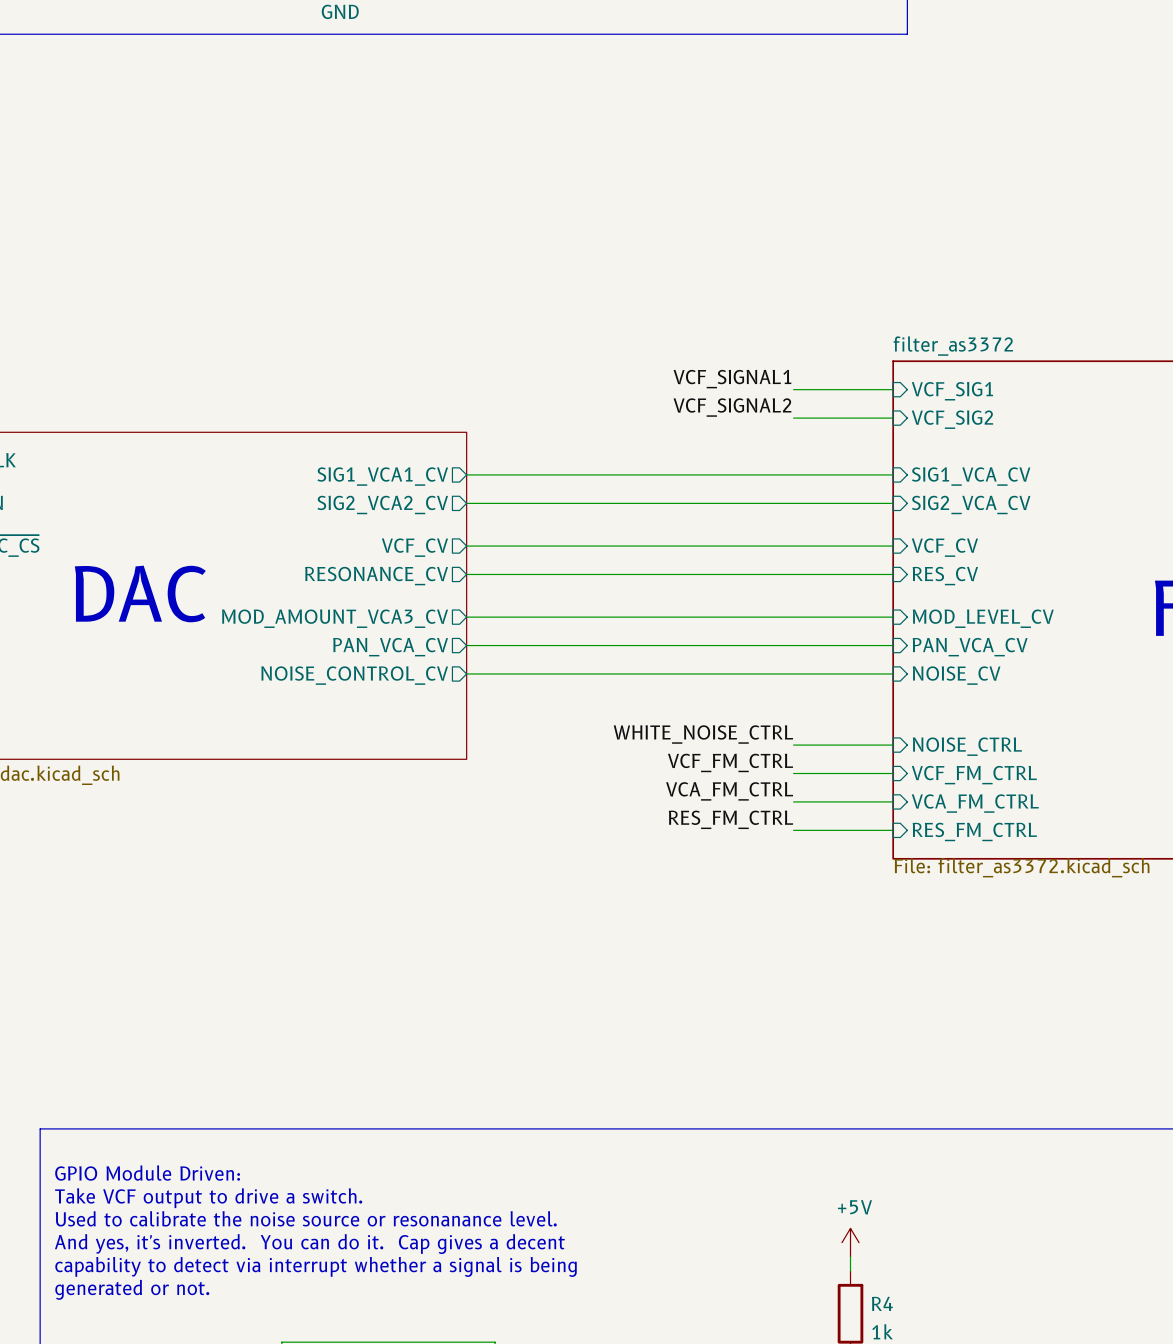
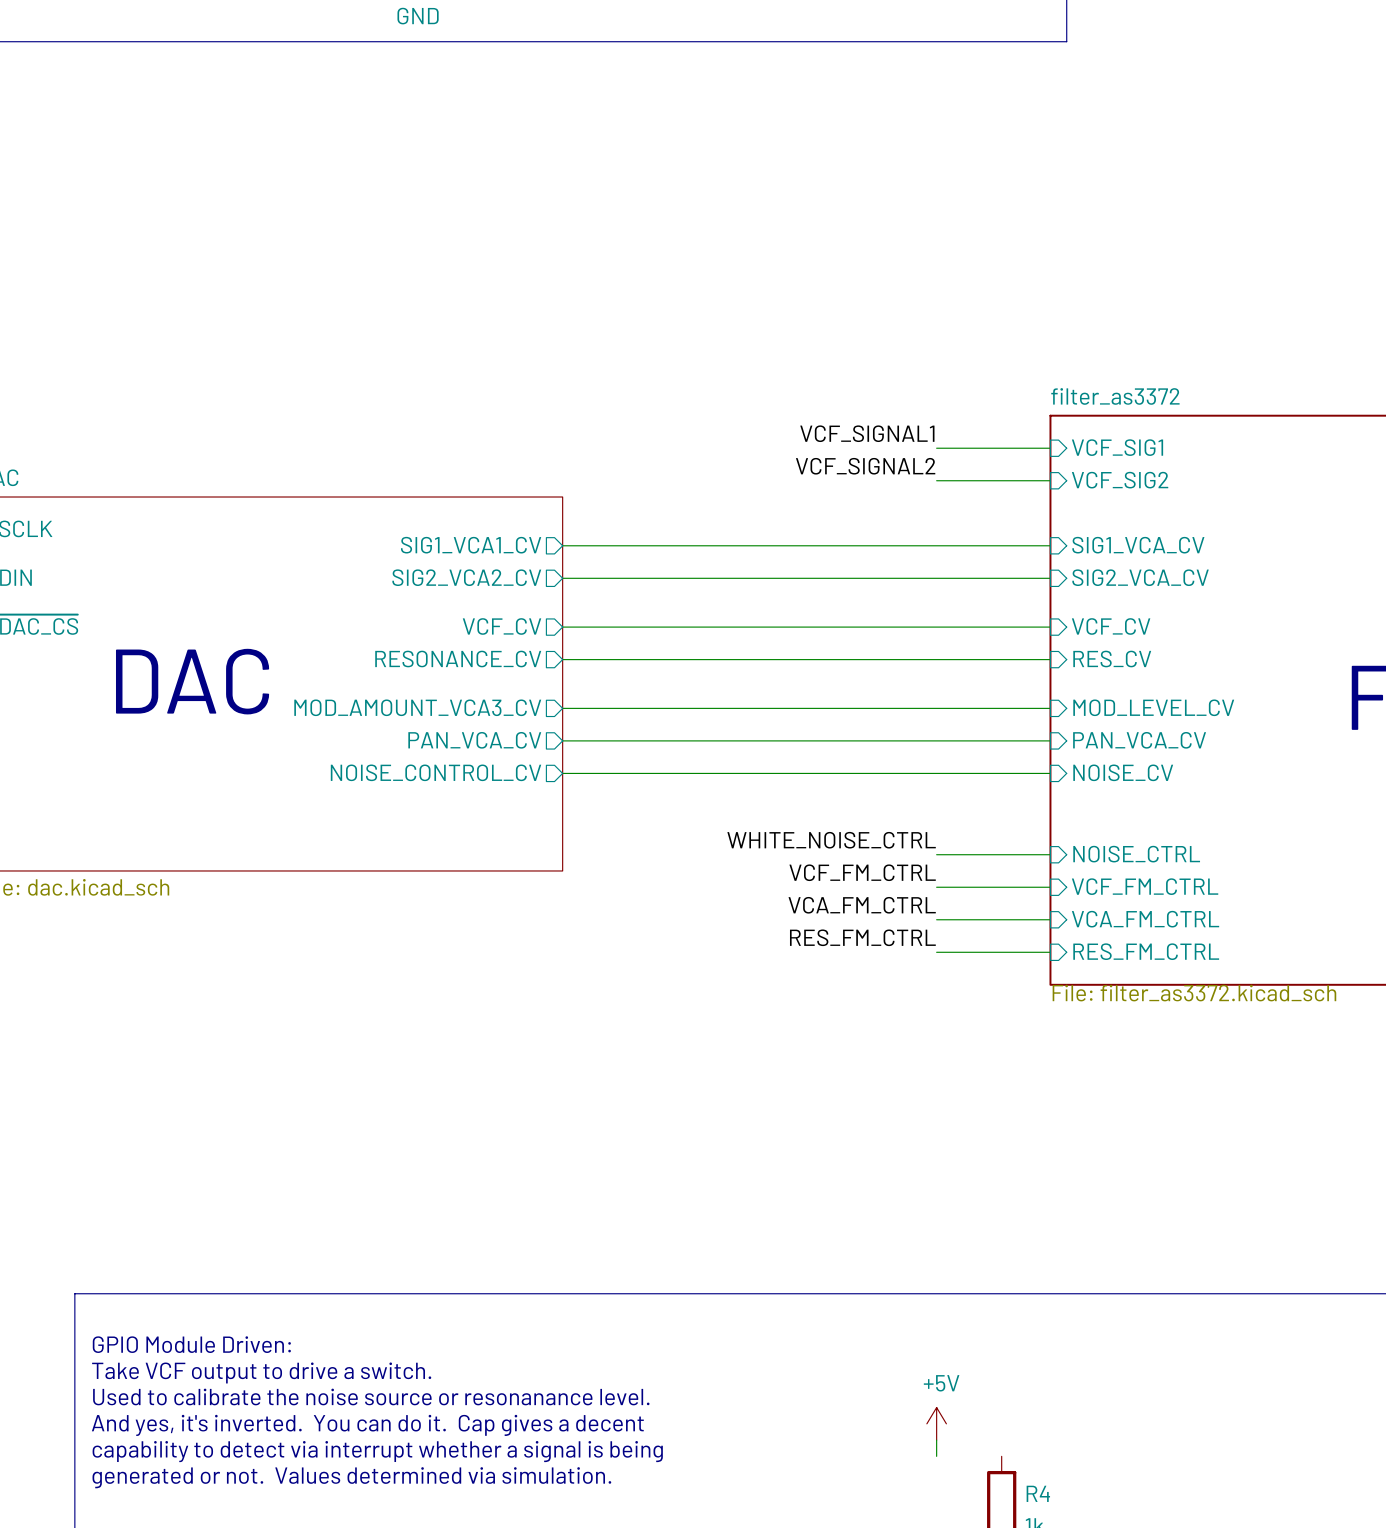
power symbol position: +5V (850, 1242) -> +5V (936, 1423)
wire: (850, 1256) (850, 1271) -> (936, 1440) (936, 1456)
text: generated or not. (132, 1289) -> generated or not. Values determined via simulation. (351, 1477)

